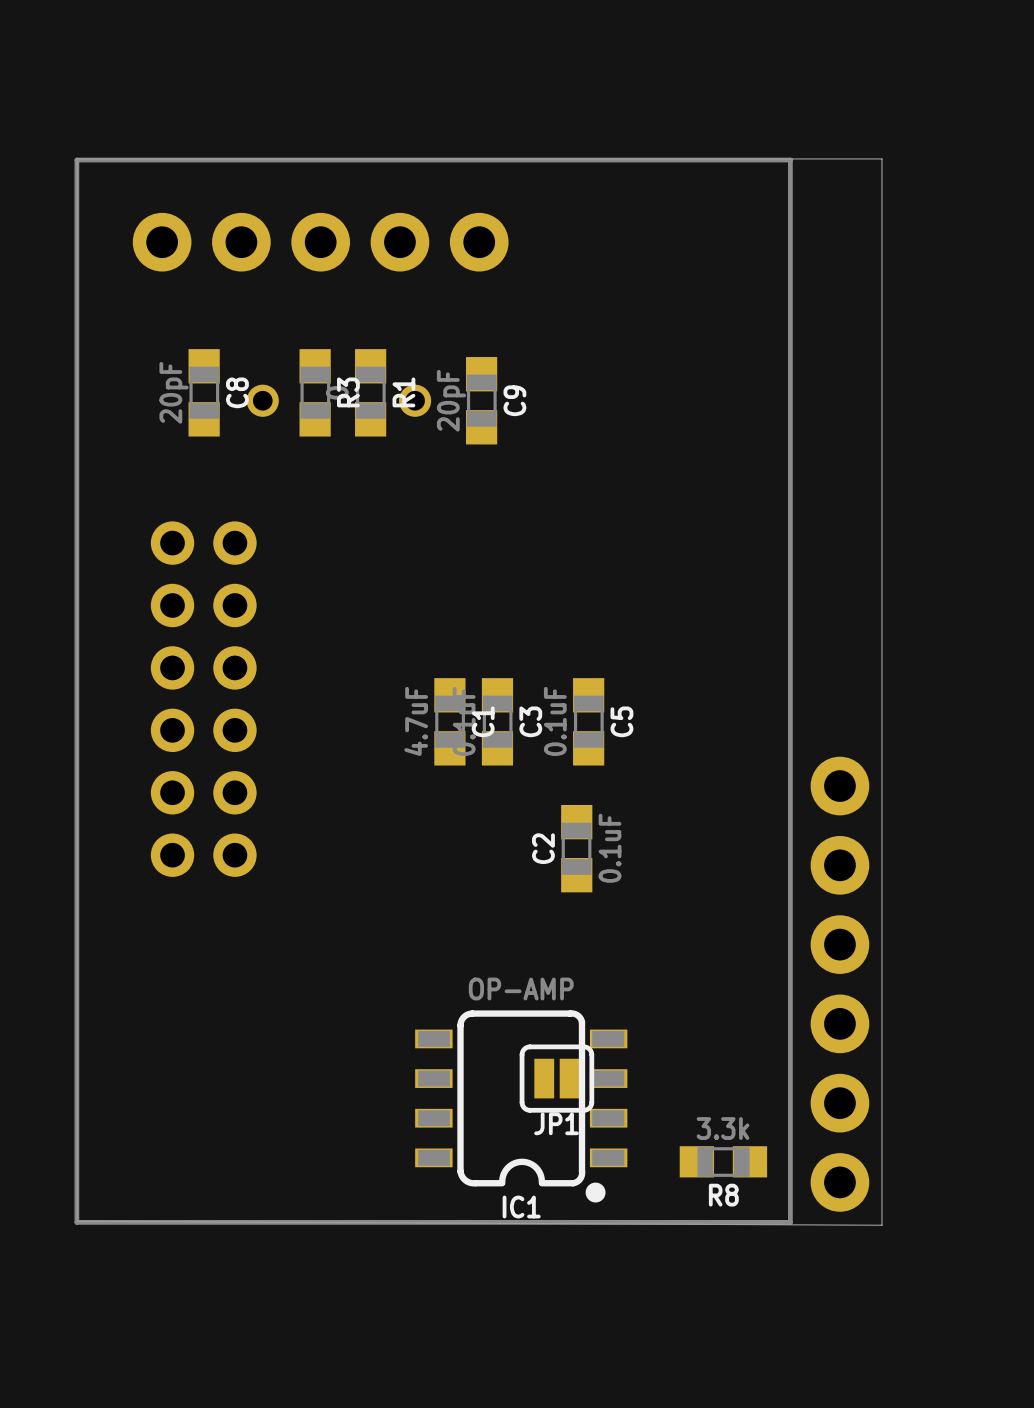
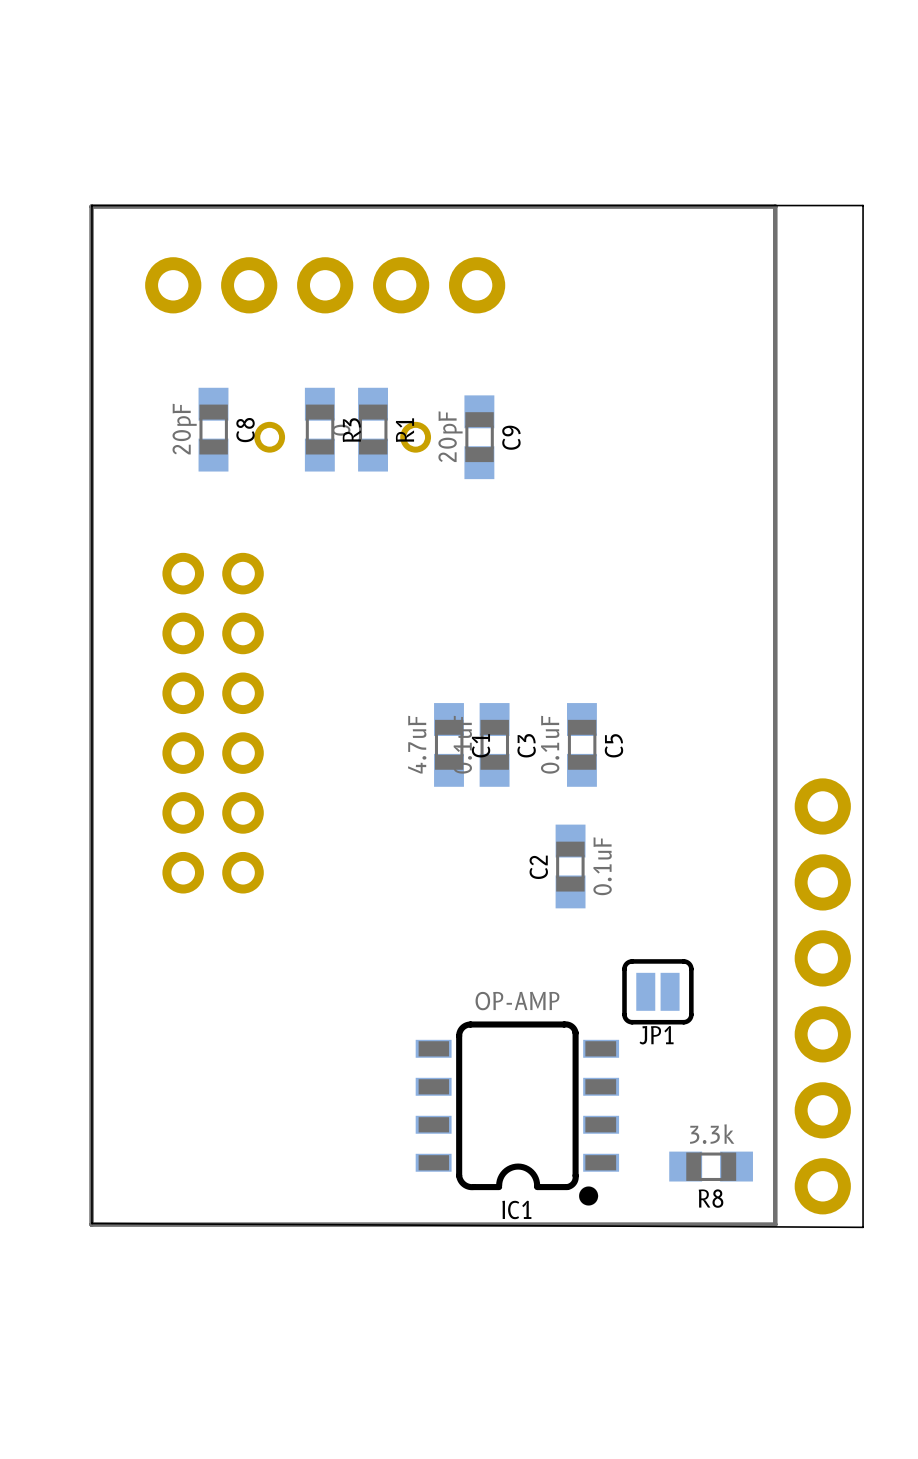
JP1 position: (556, 1078) -> (657, 991)

